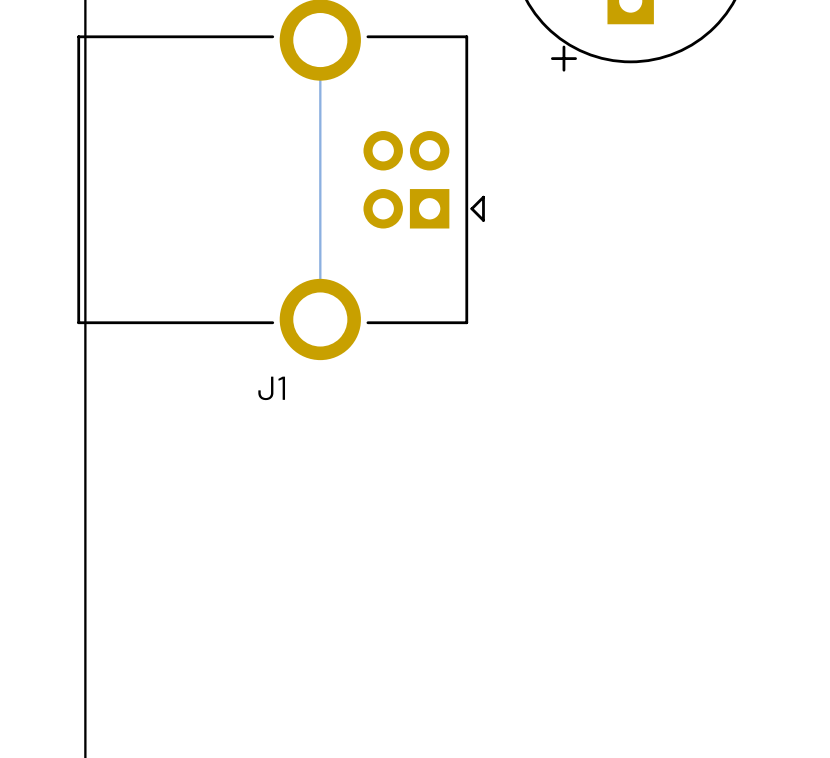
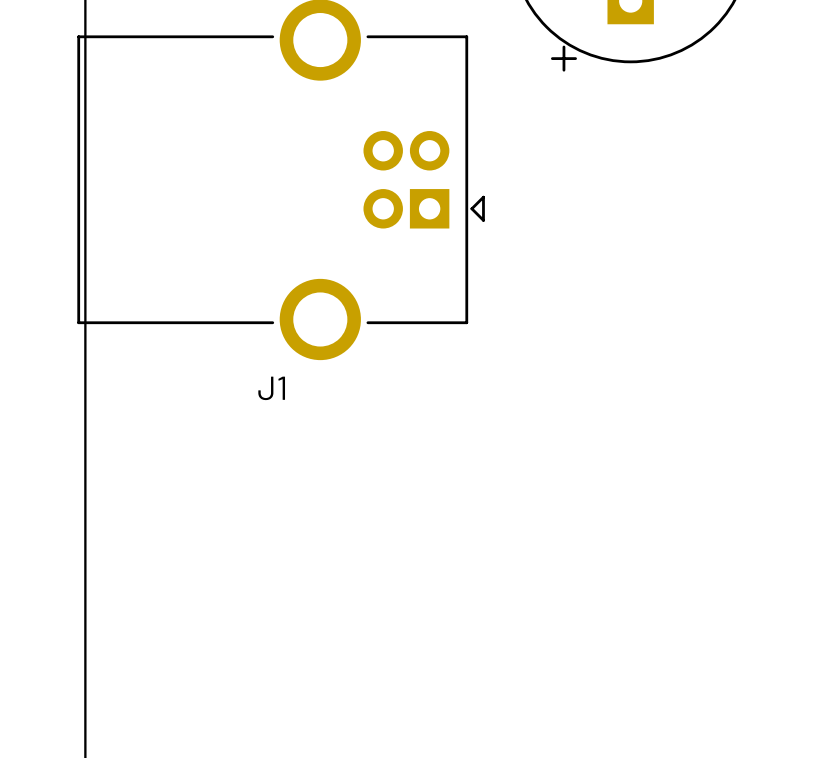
bottom track: (320, 40) (320, 319) -> none

